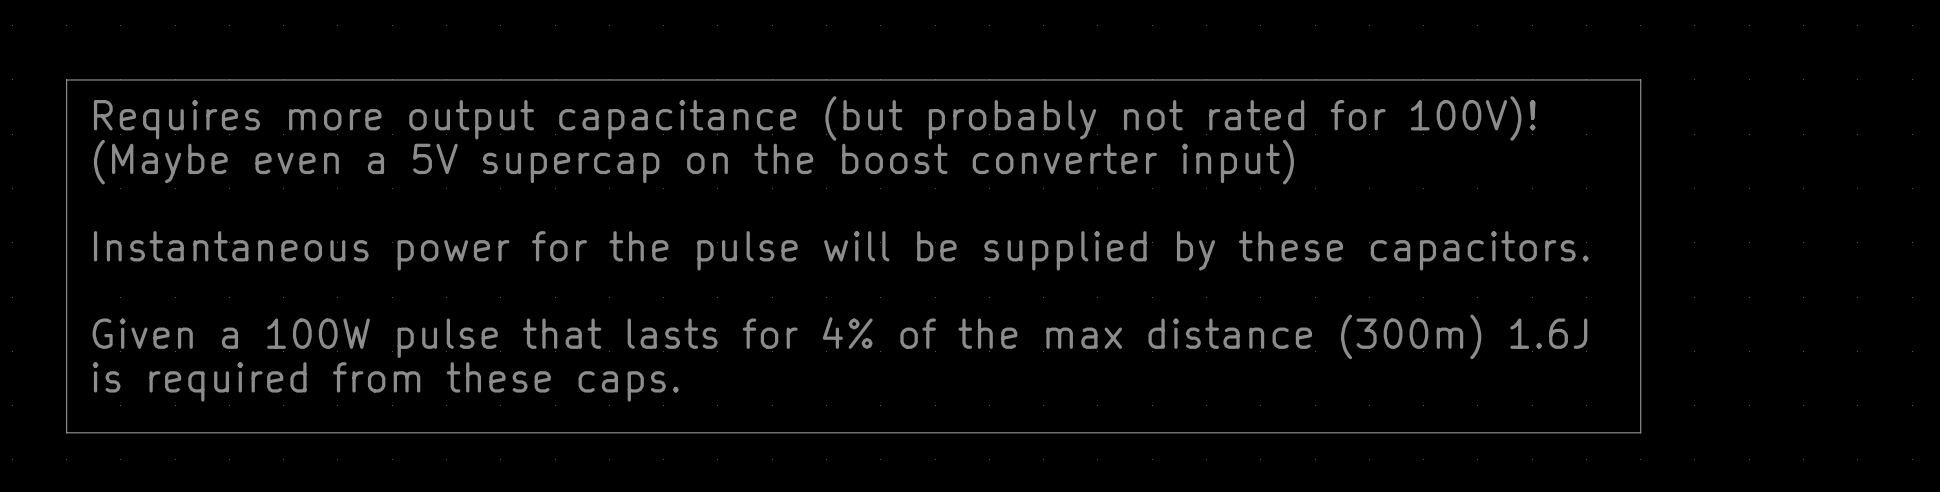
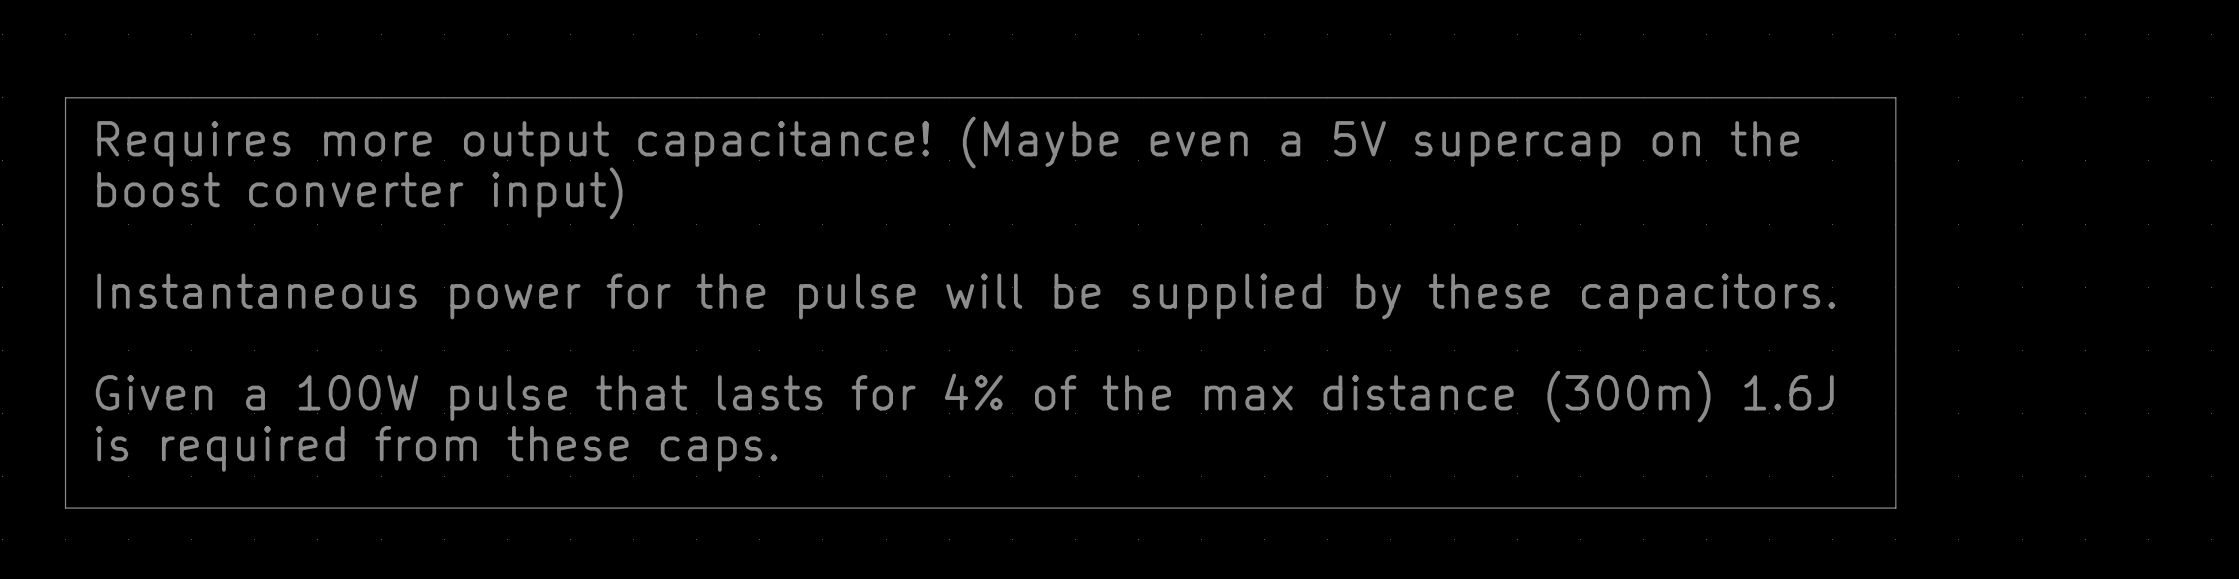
text: Requires more output capacitance (but probably not rated for 100V)! (814, 118) -> Requires more output capacitance! (Maybe even a 5V supercap on the (948, 142)
text: (Maybe even a 5V supercap on the boost converter input) (693, 162) -> boost converter input) (359, 193)

